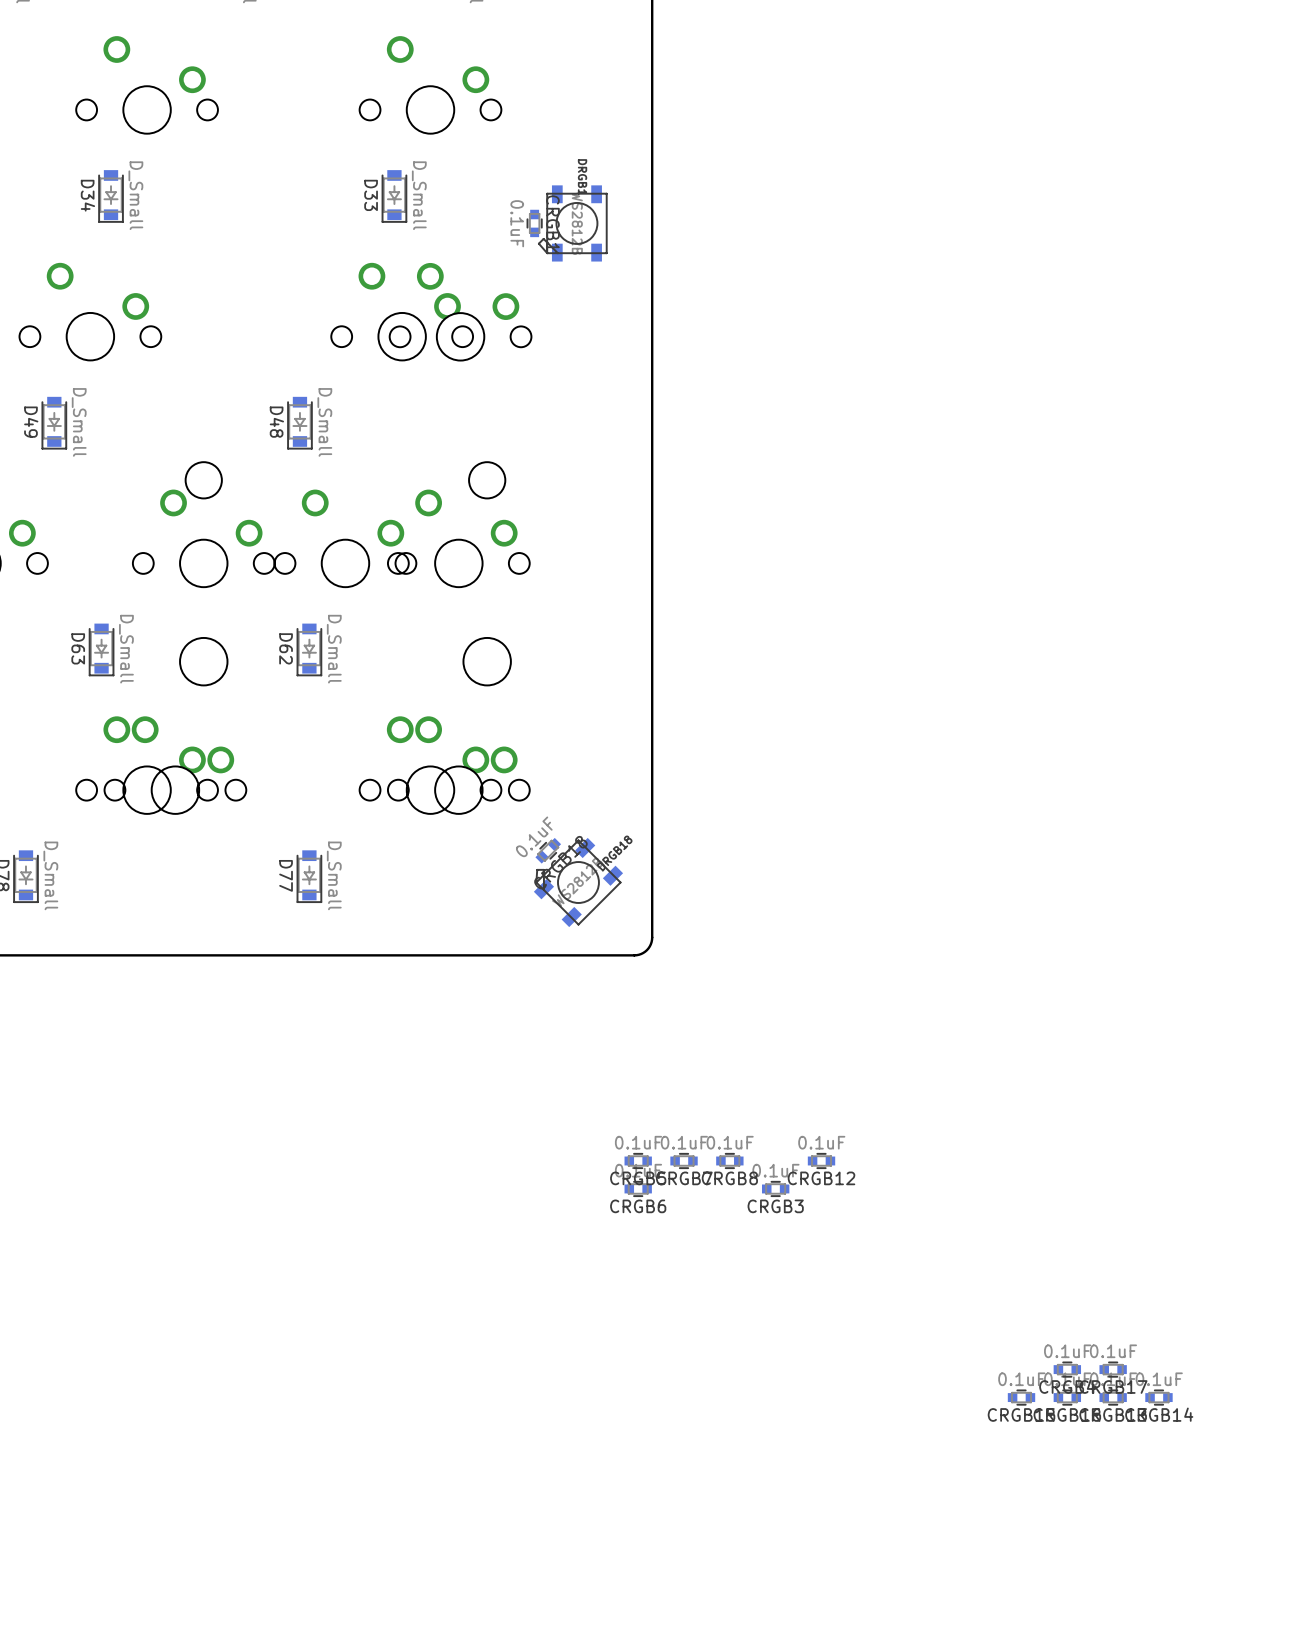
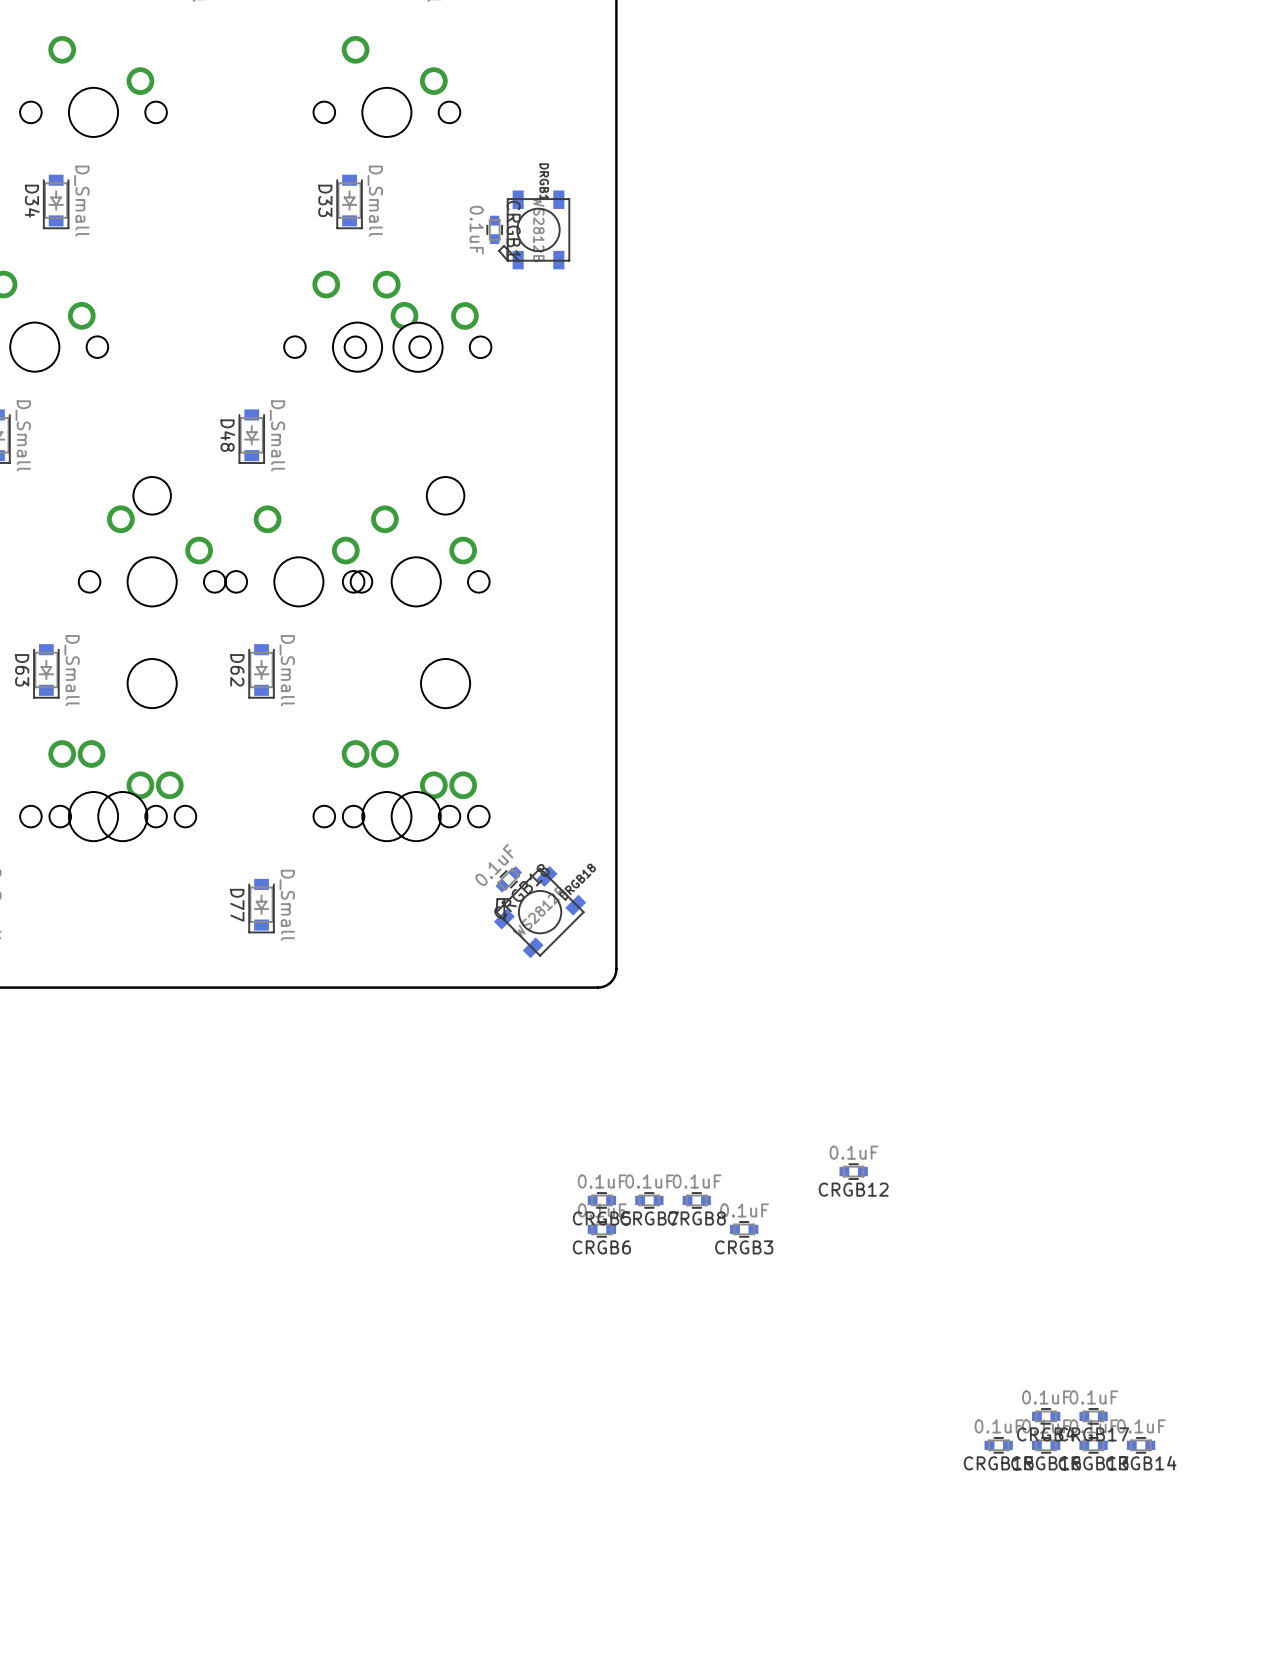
CRGB12 position: (821, 1160) -> (853, 1171)

